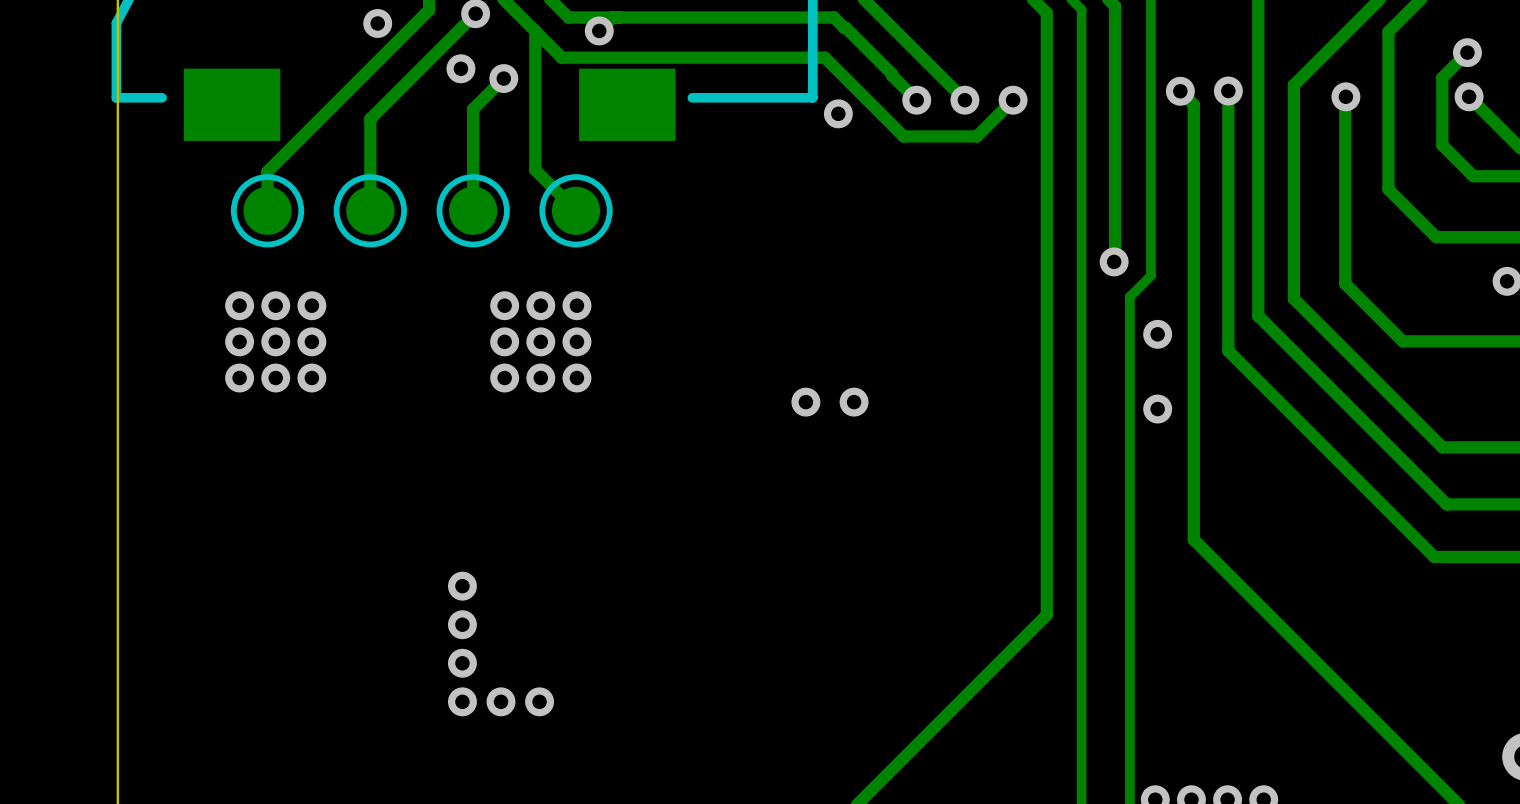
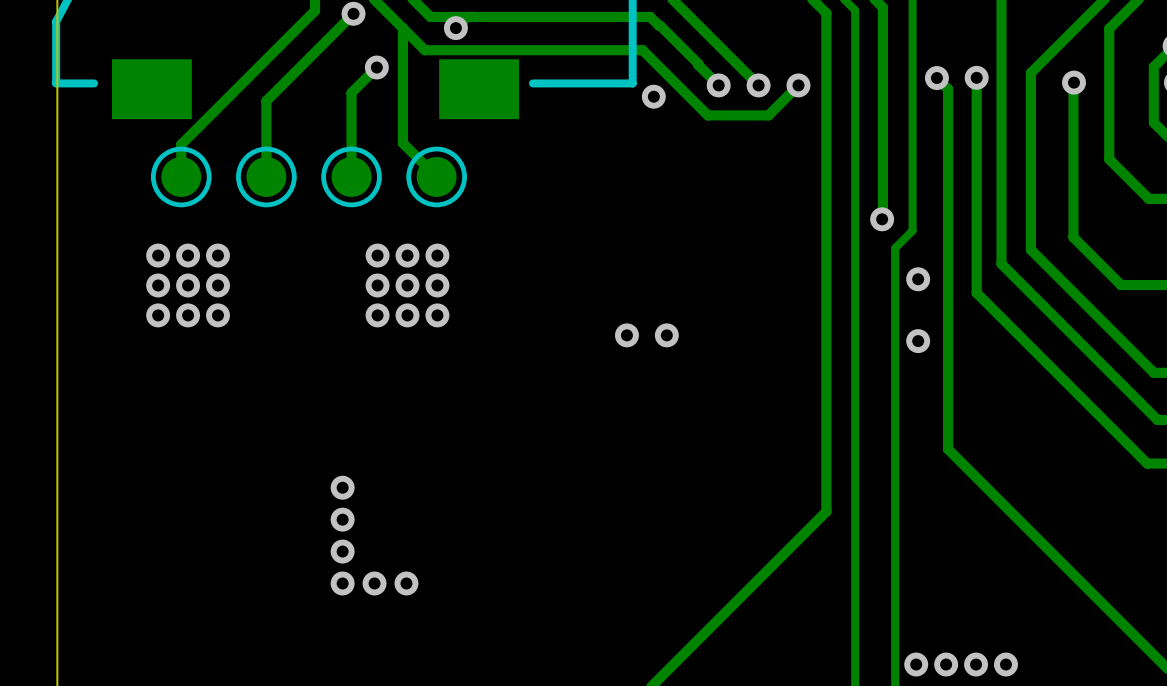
via: (377, 23) -> none
via: (460, 68) -> none

